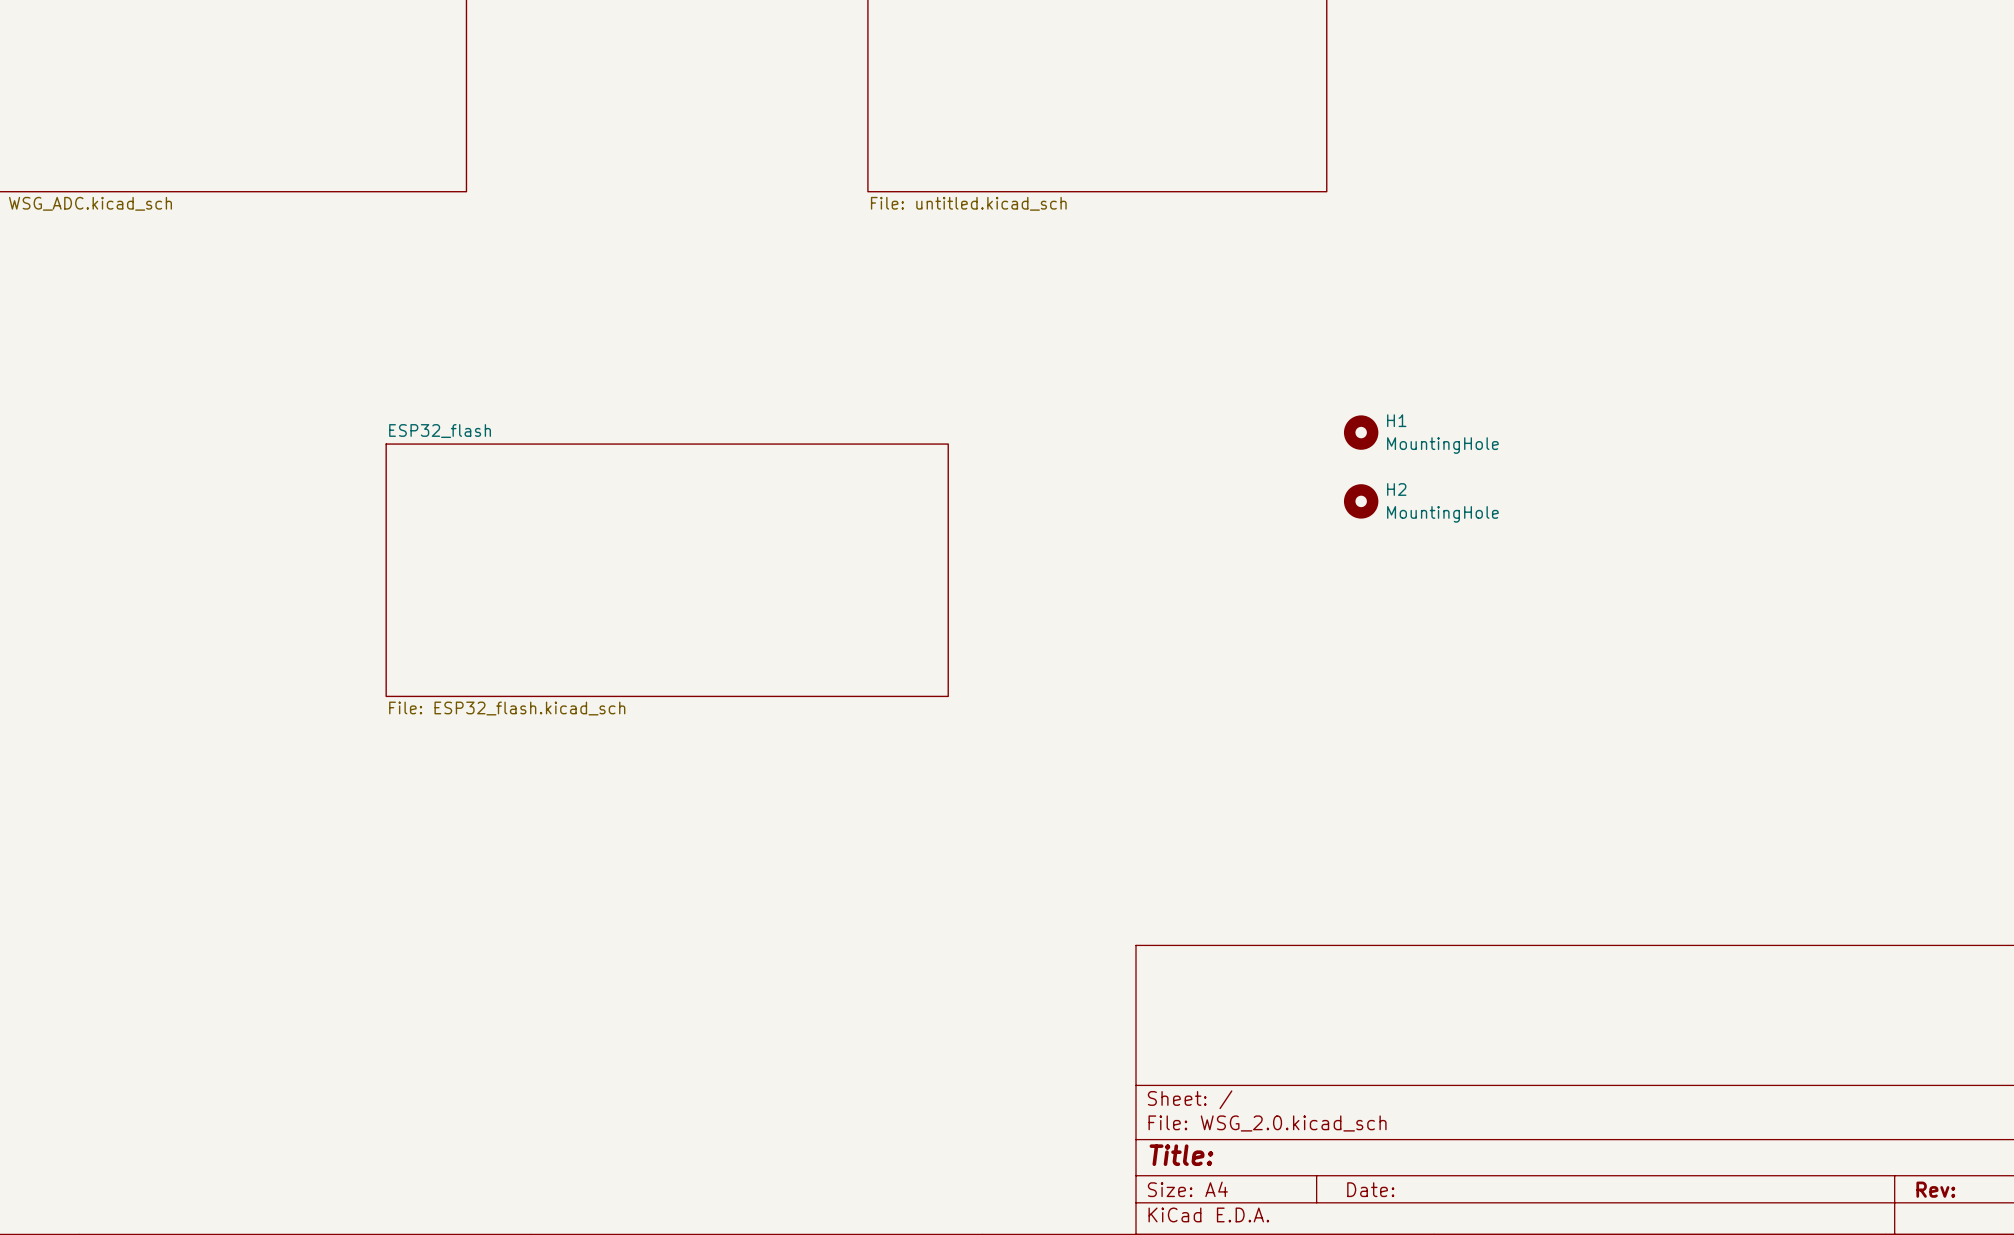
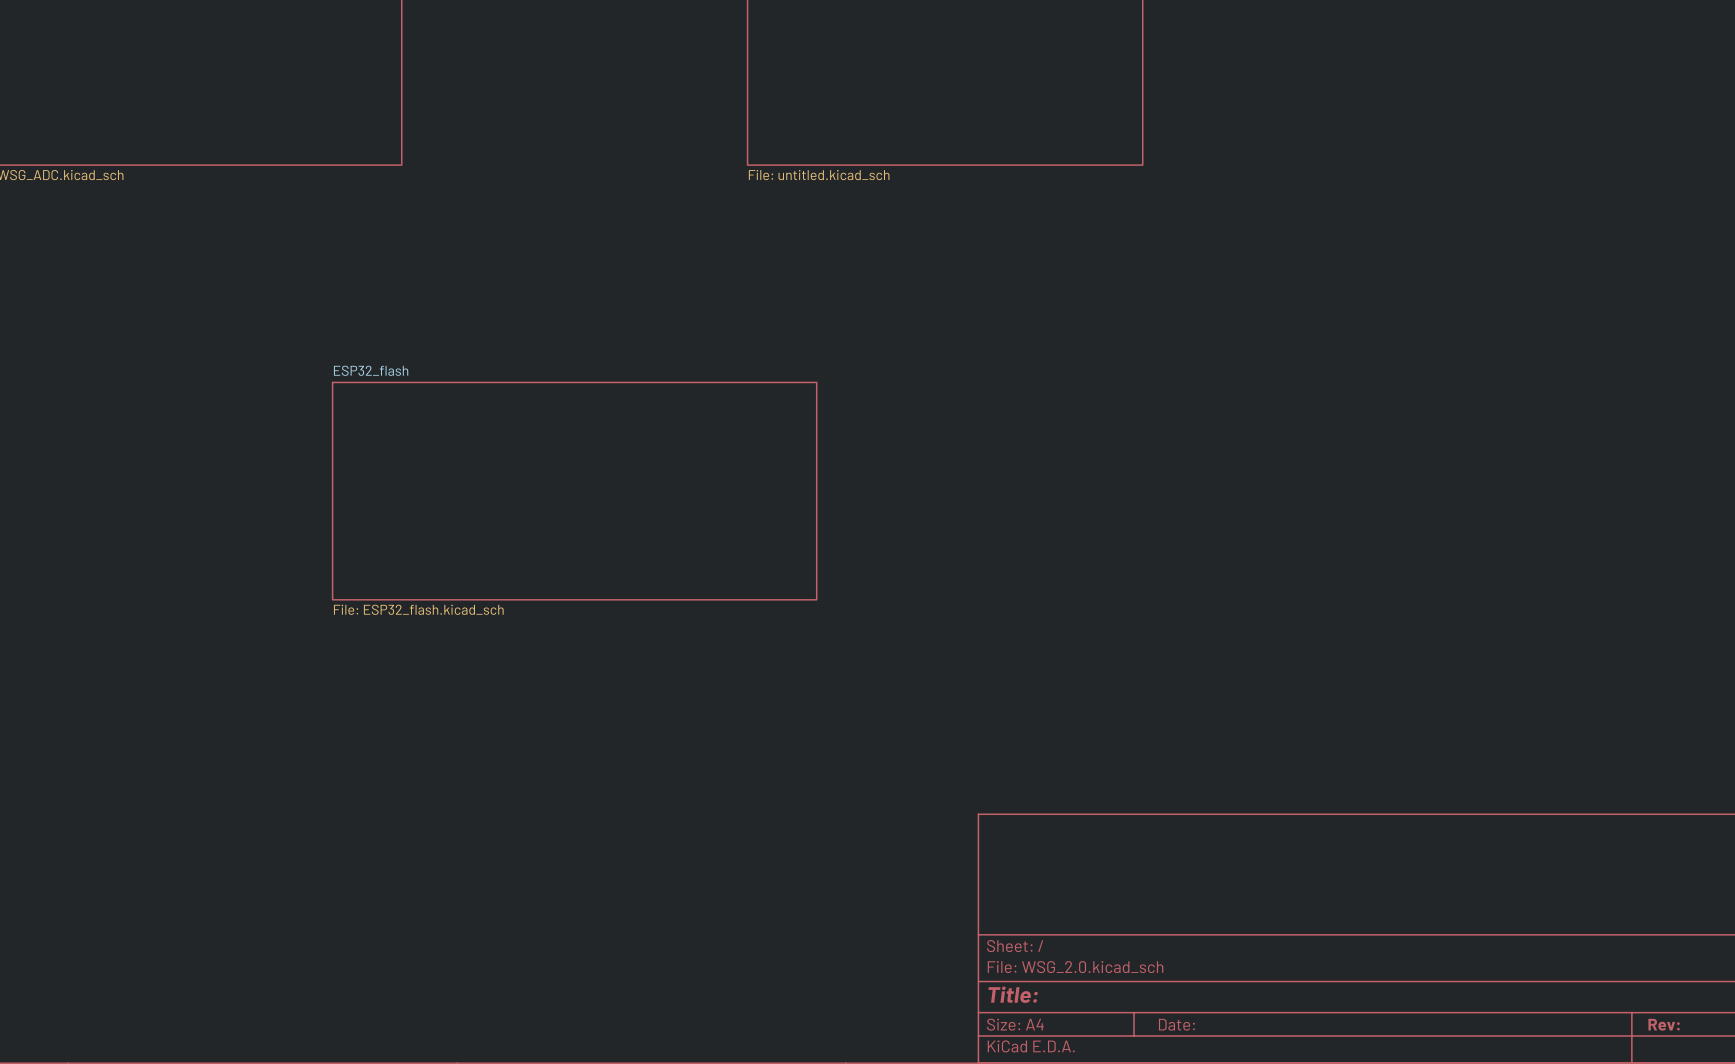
H1: MountingHole (1361, 432) -> none
H2: MountingHole (1361, 501) -> none

